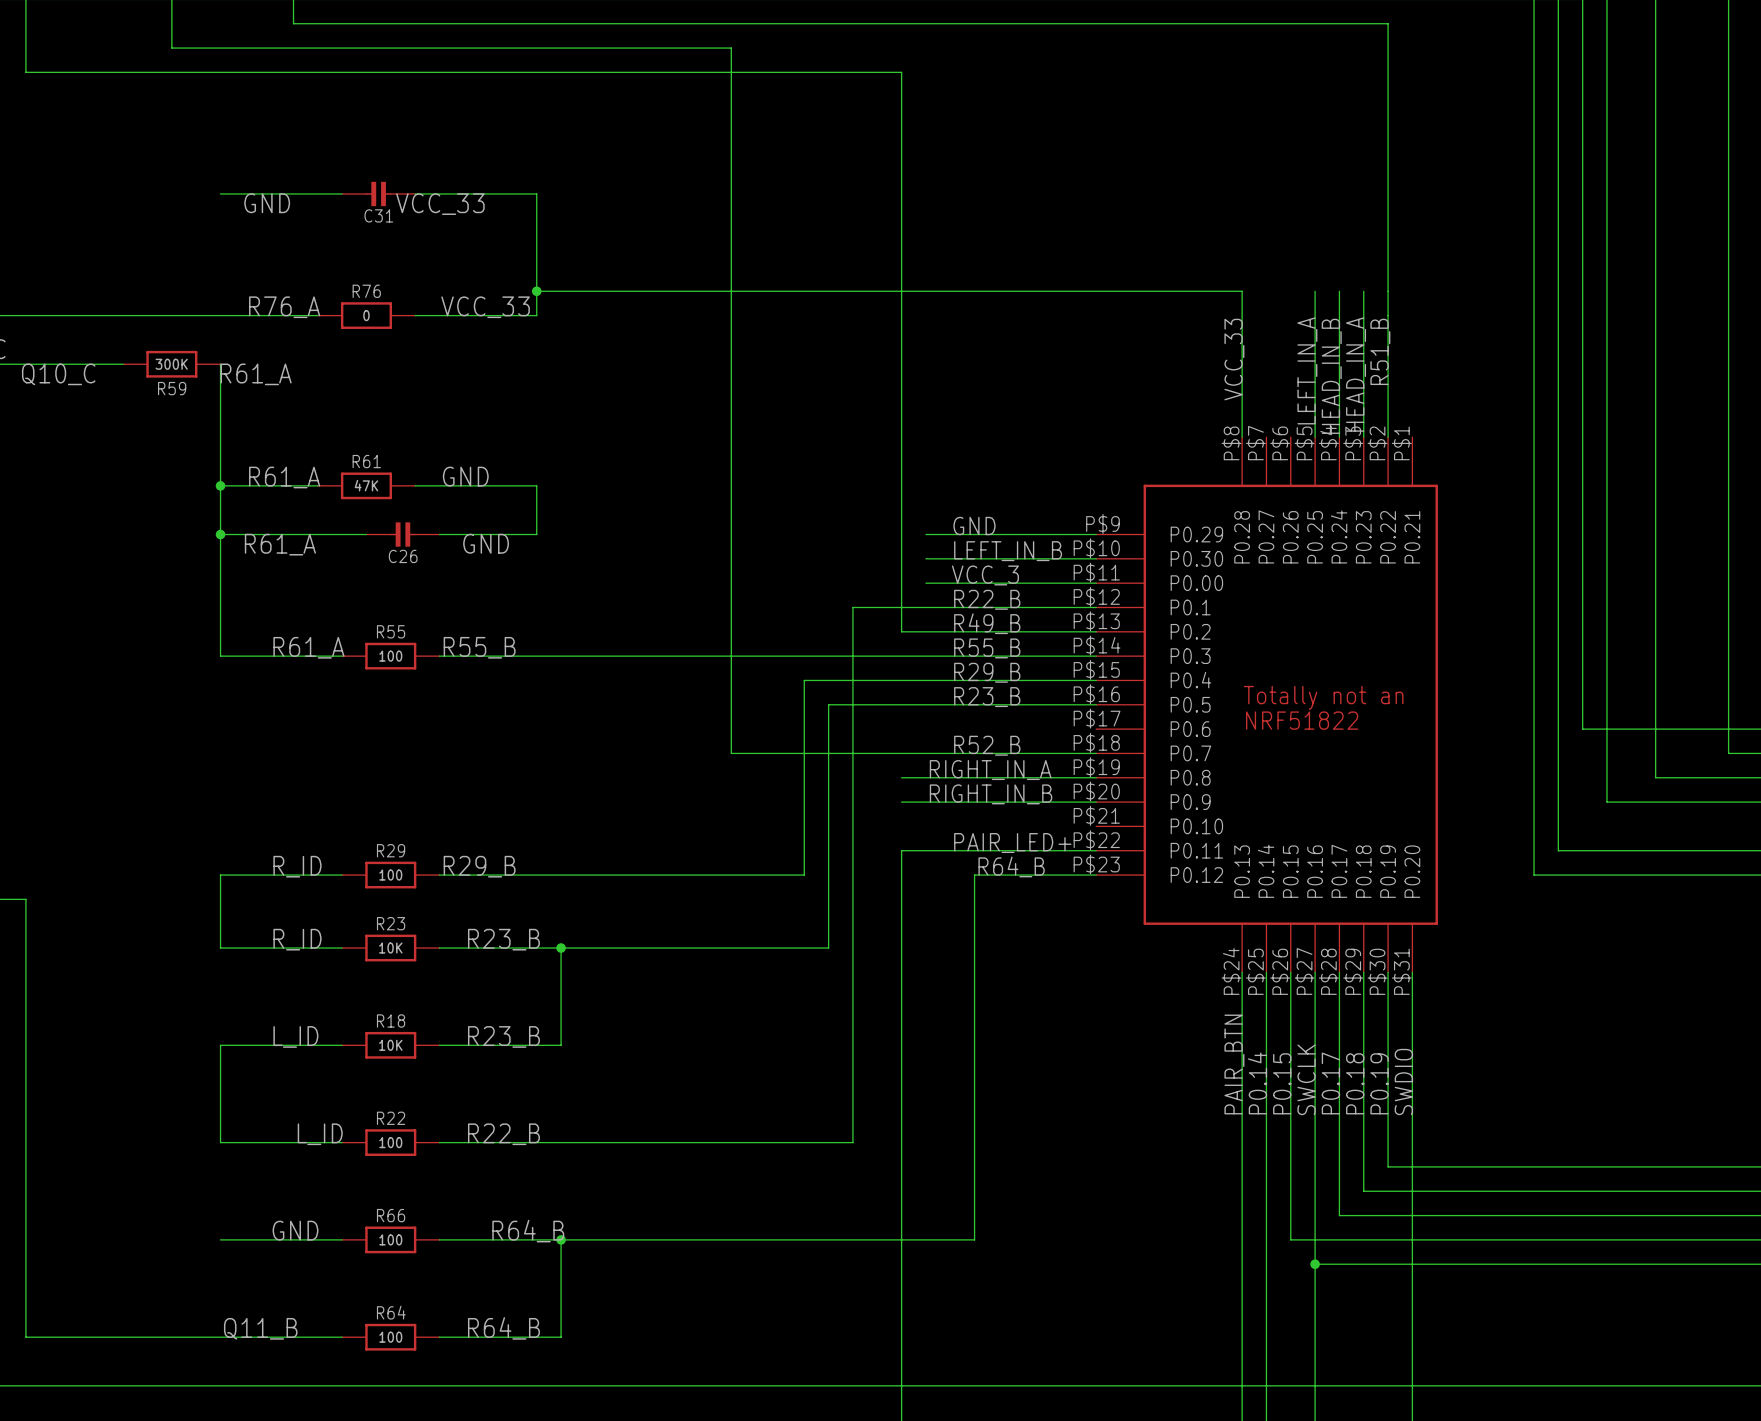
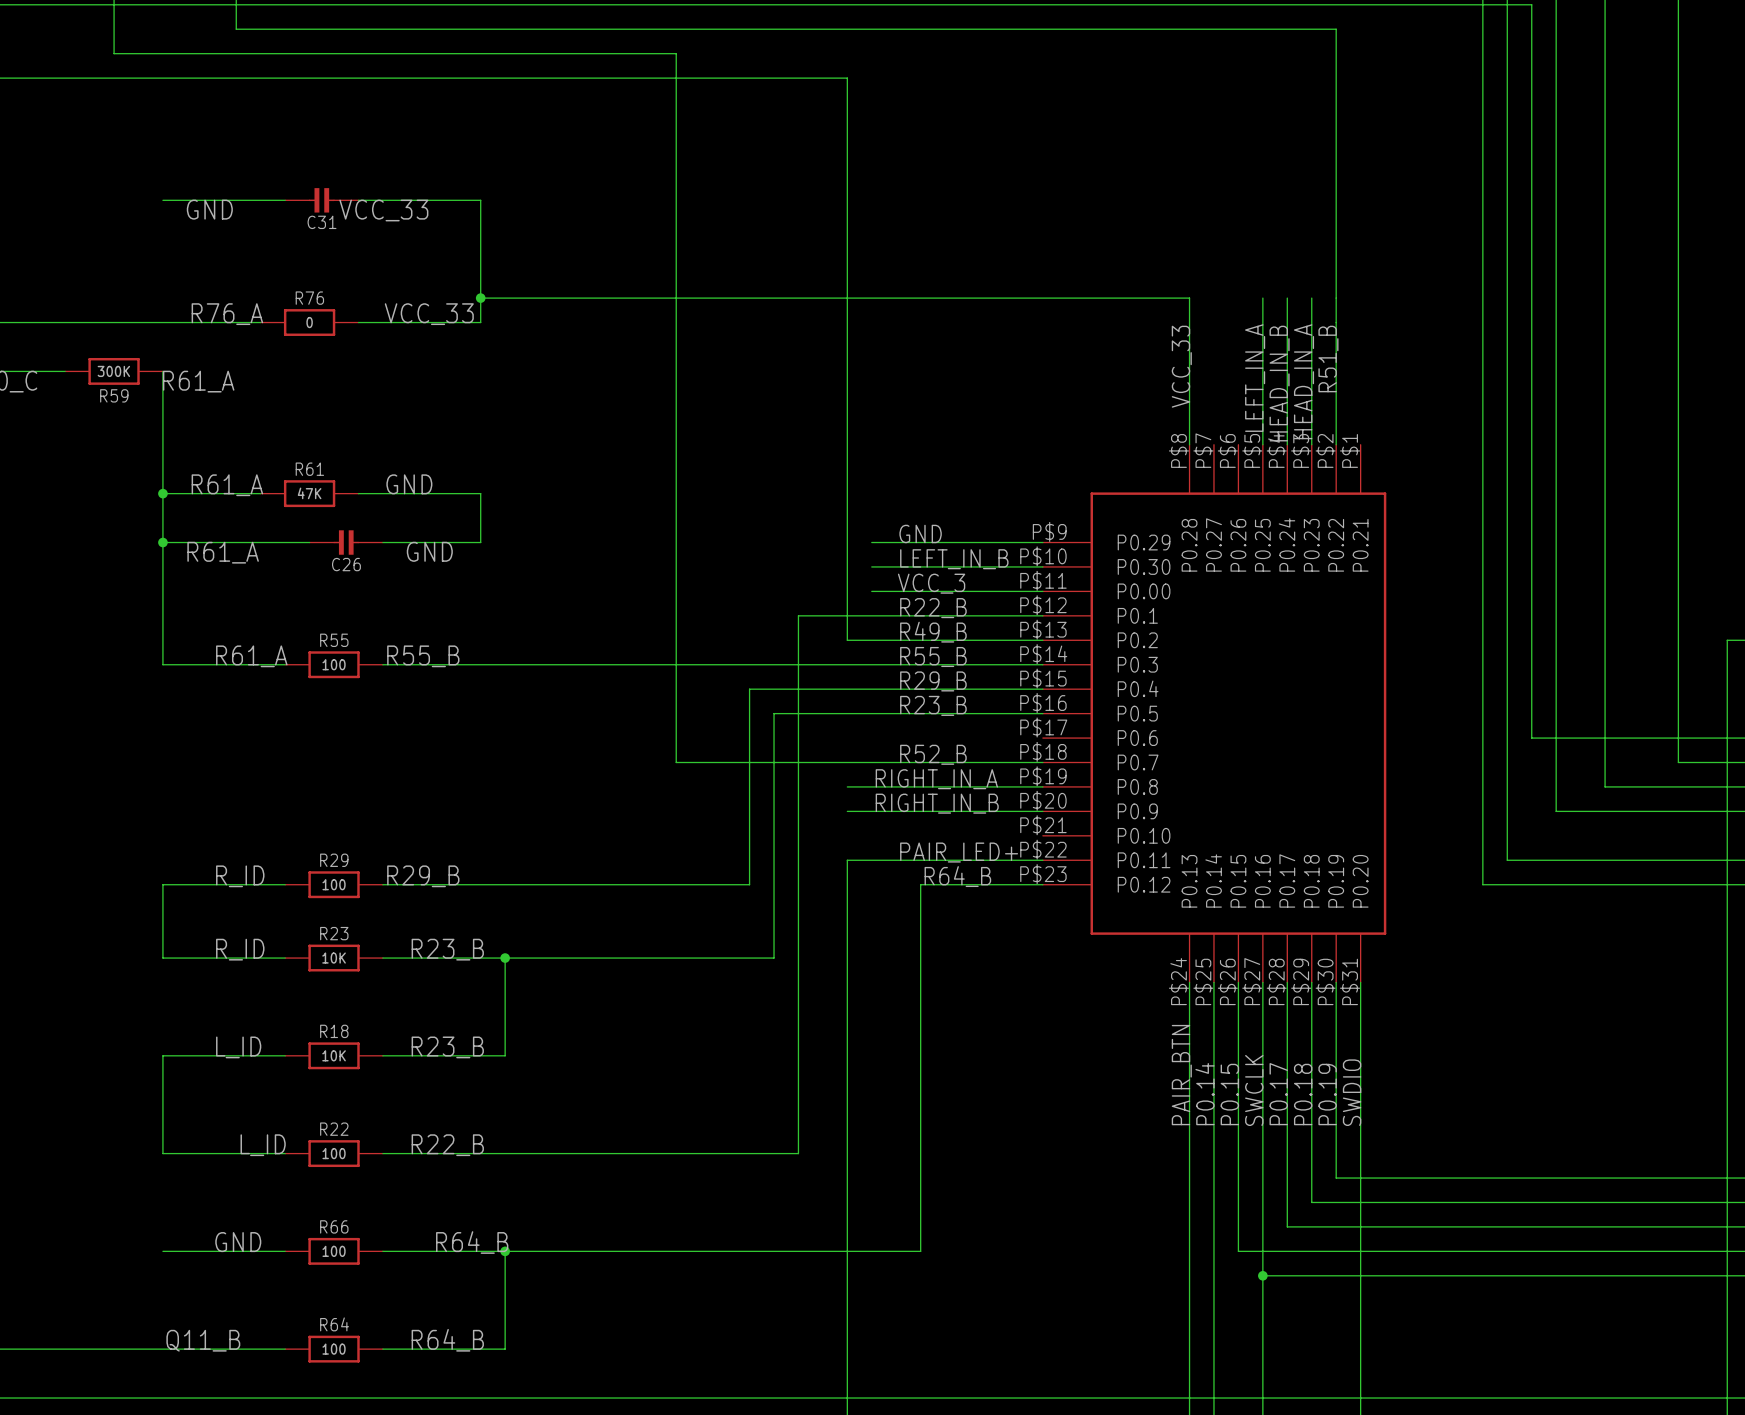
text: Totally not an (1323, 697) -> none
text: NRF51822 (1302, 720) -> none

